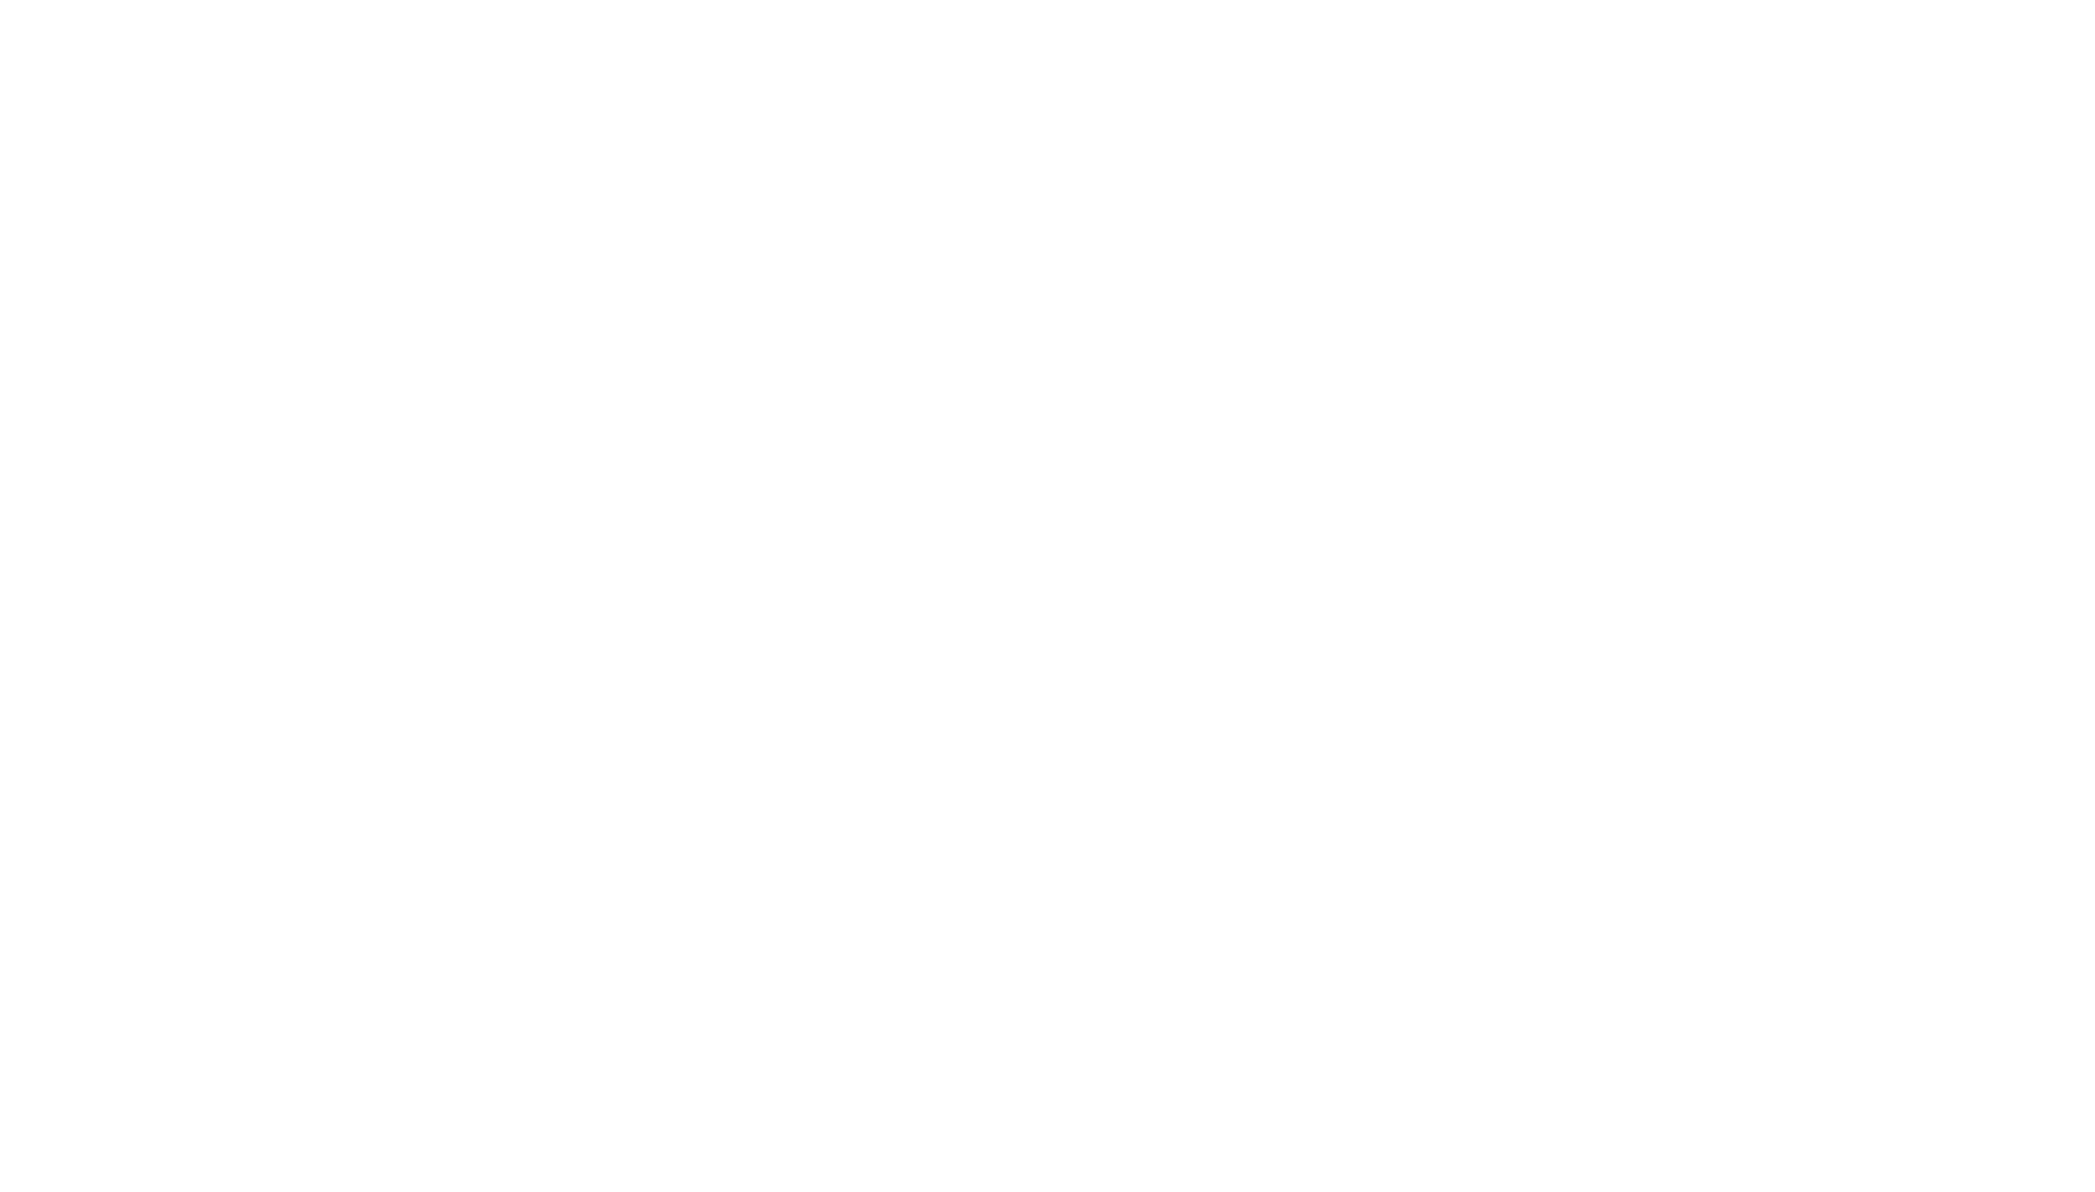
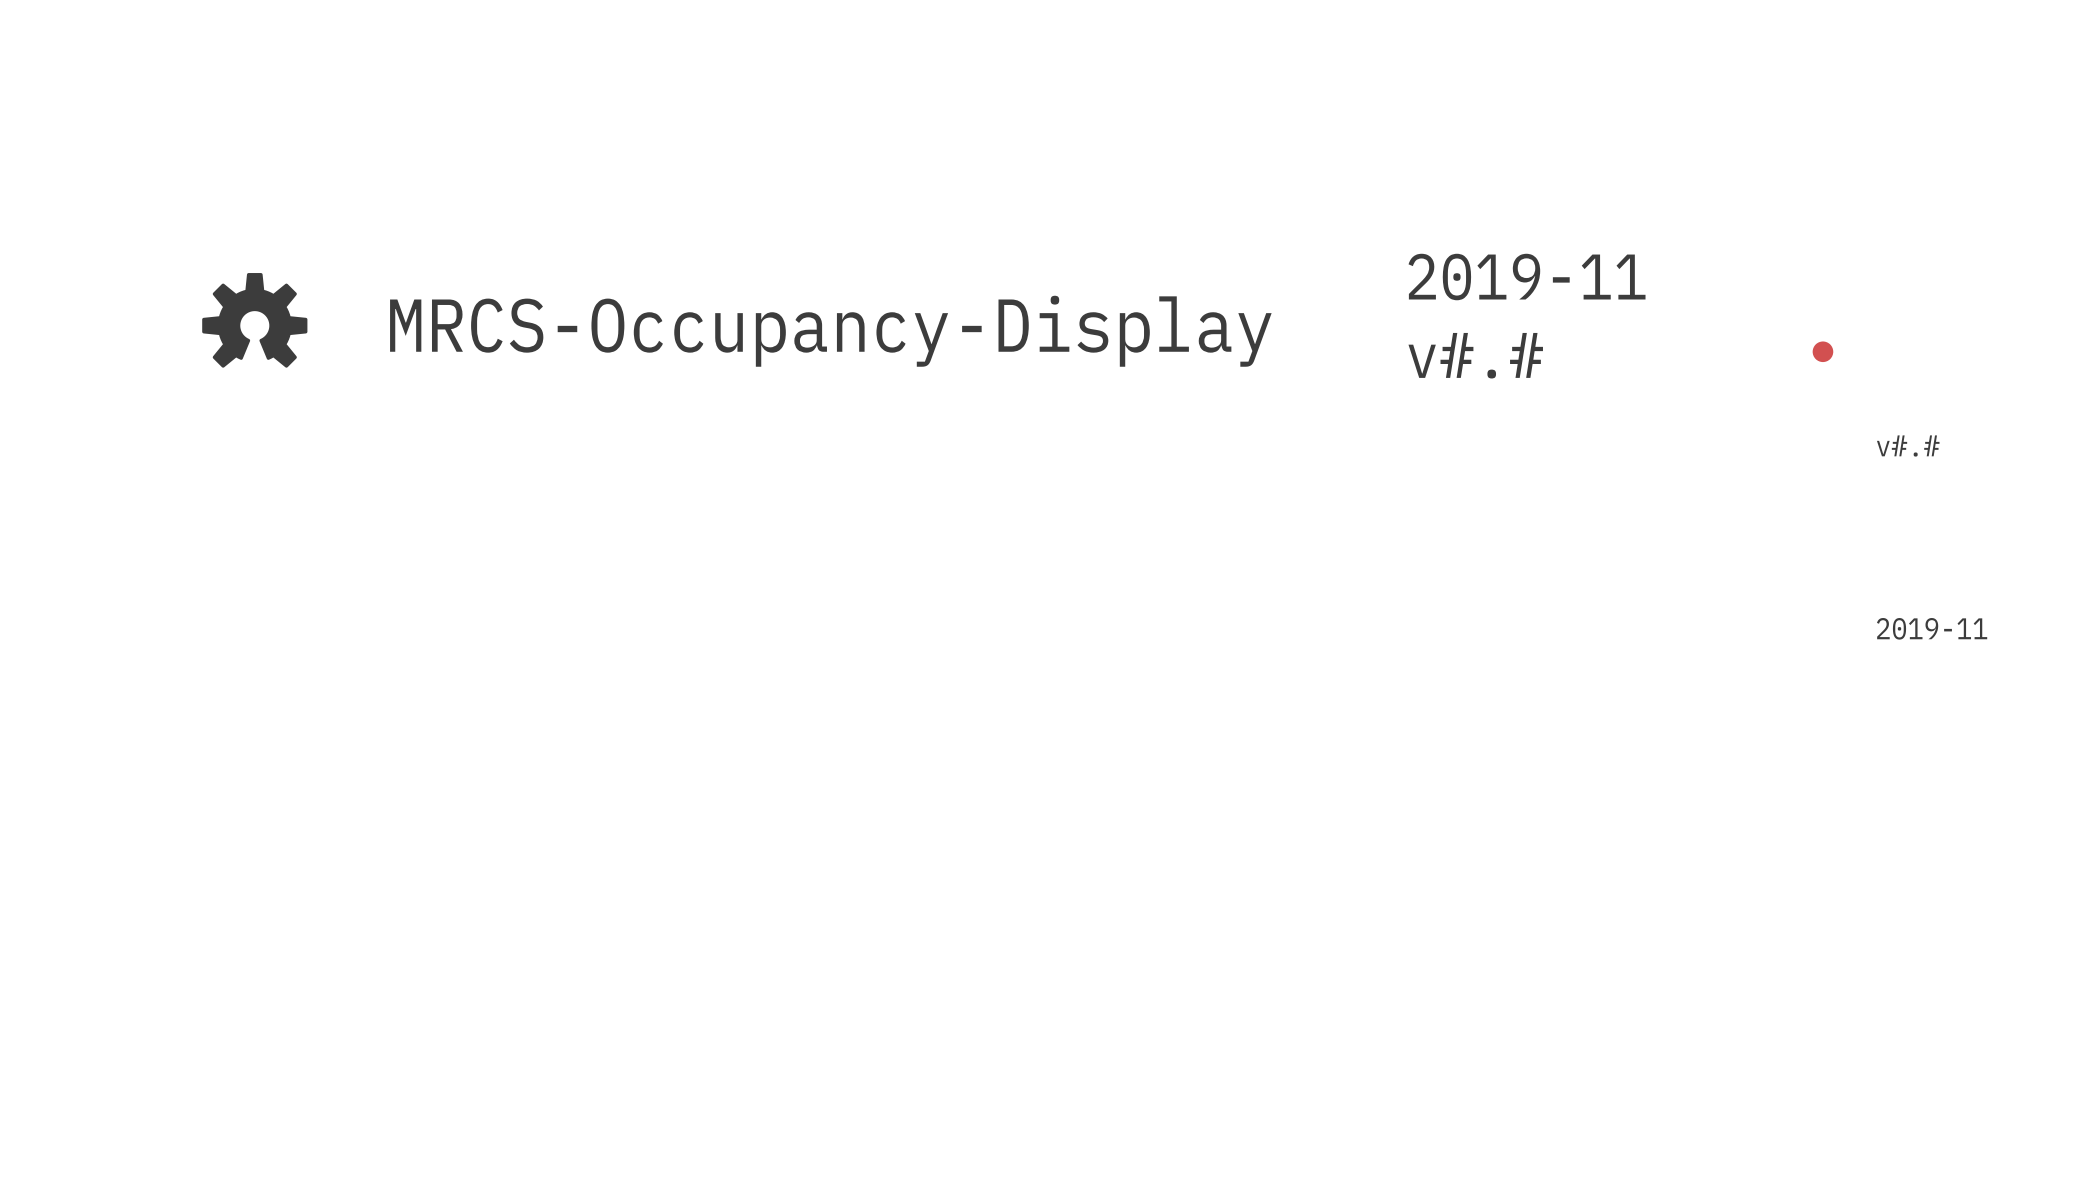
drawing: none -> [202, 273, 308, 368]
text: none -> 2019-11 (1527, 277)
text: none -> MRCS-Occupancy-Display (830, 331)
part: none -> (1822, 351)
text: none -> v#.# (1475, 355)
text: none -> v#.# (1908, 445)
text: none -> 2019-11 (1932, 628)

